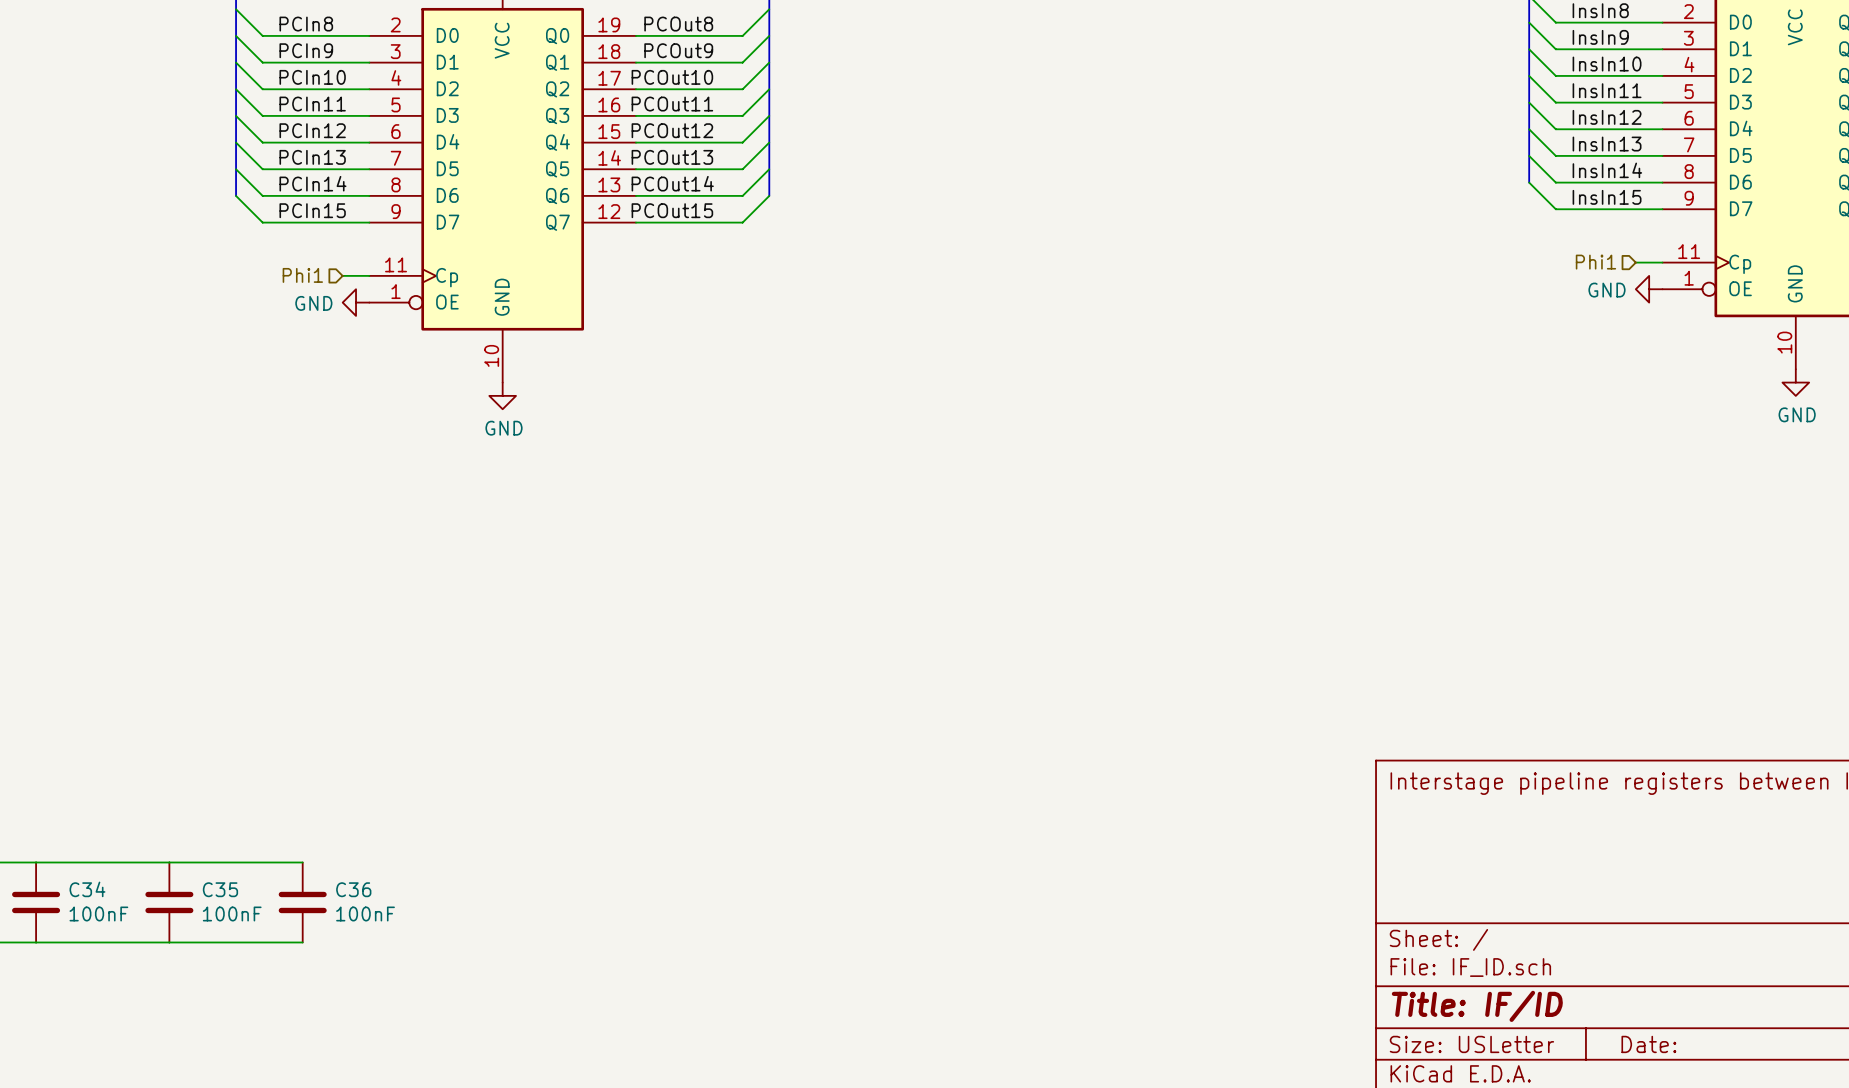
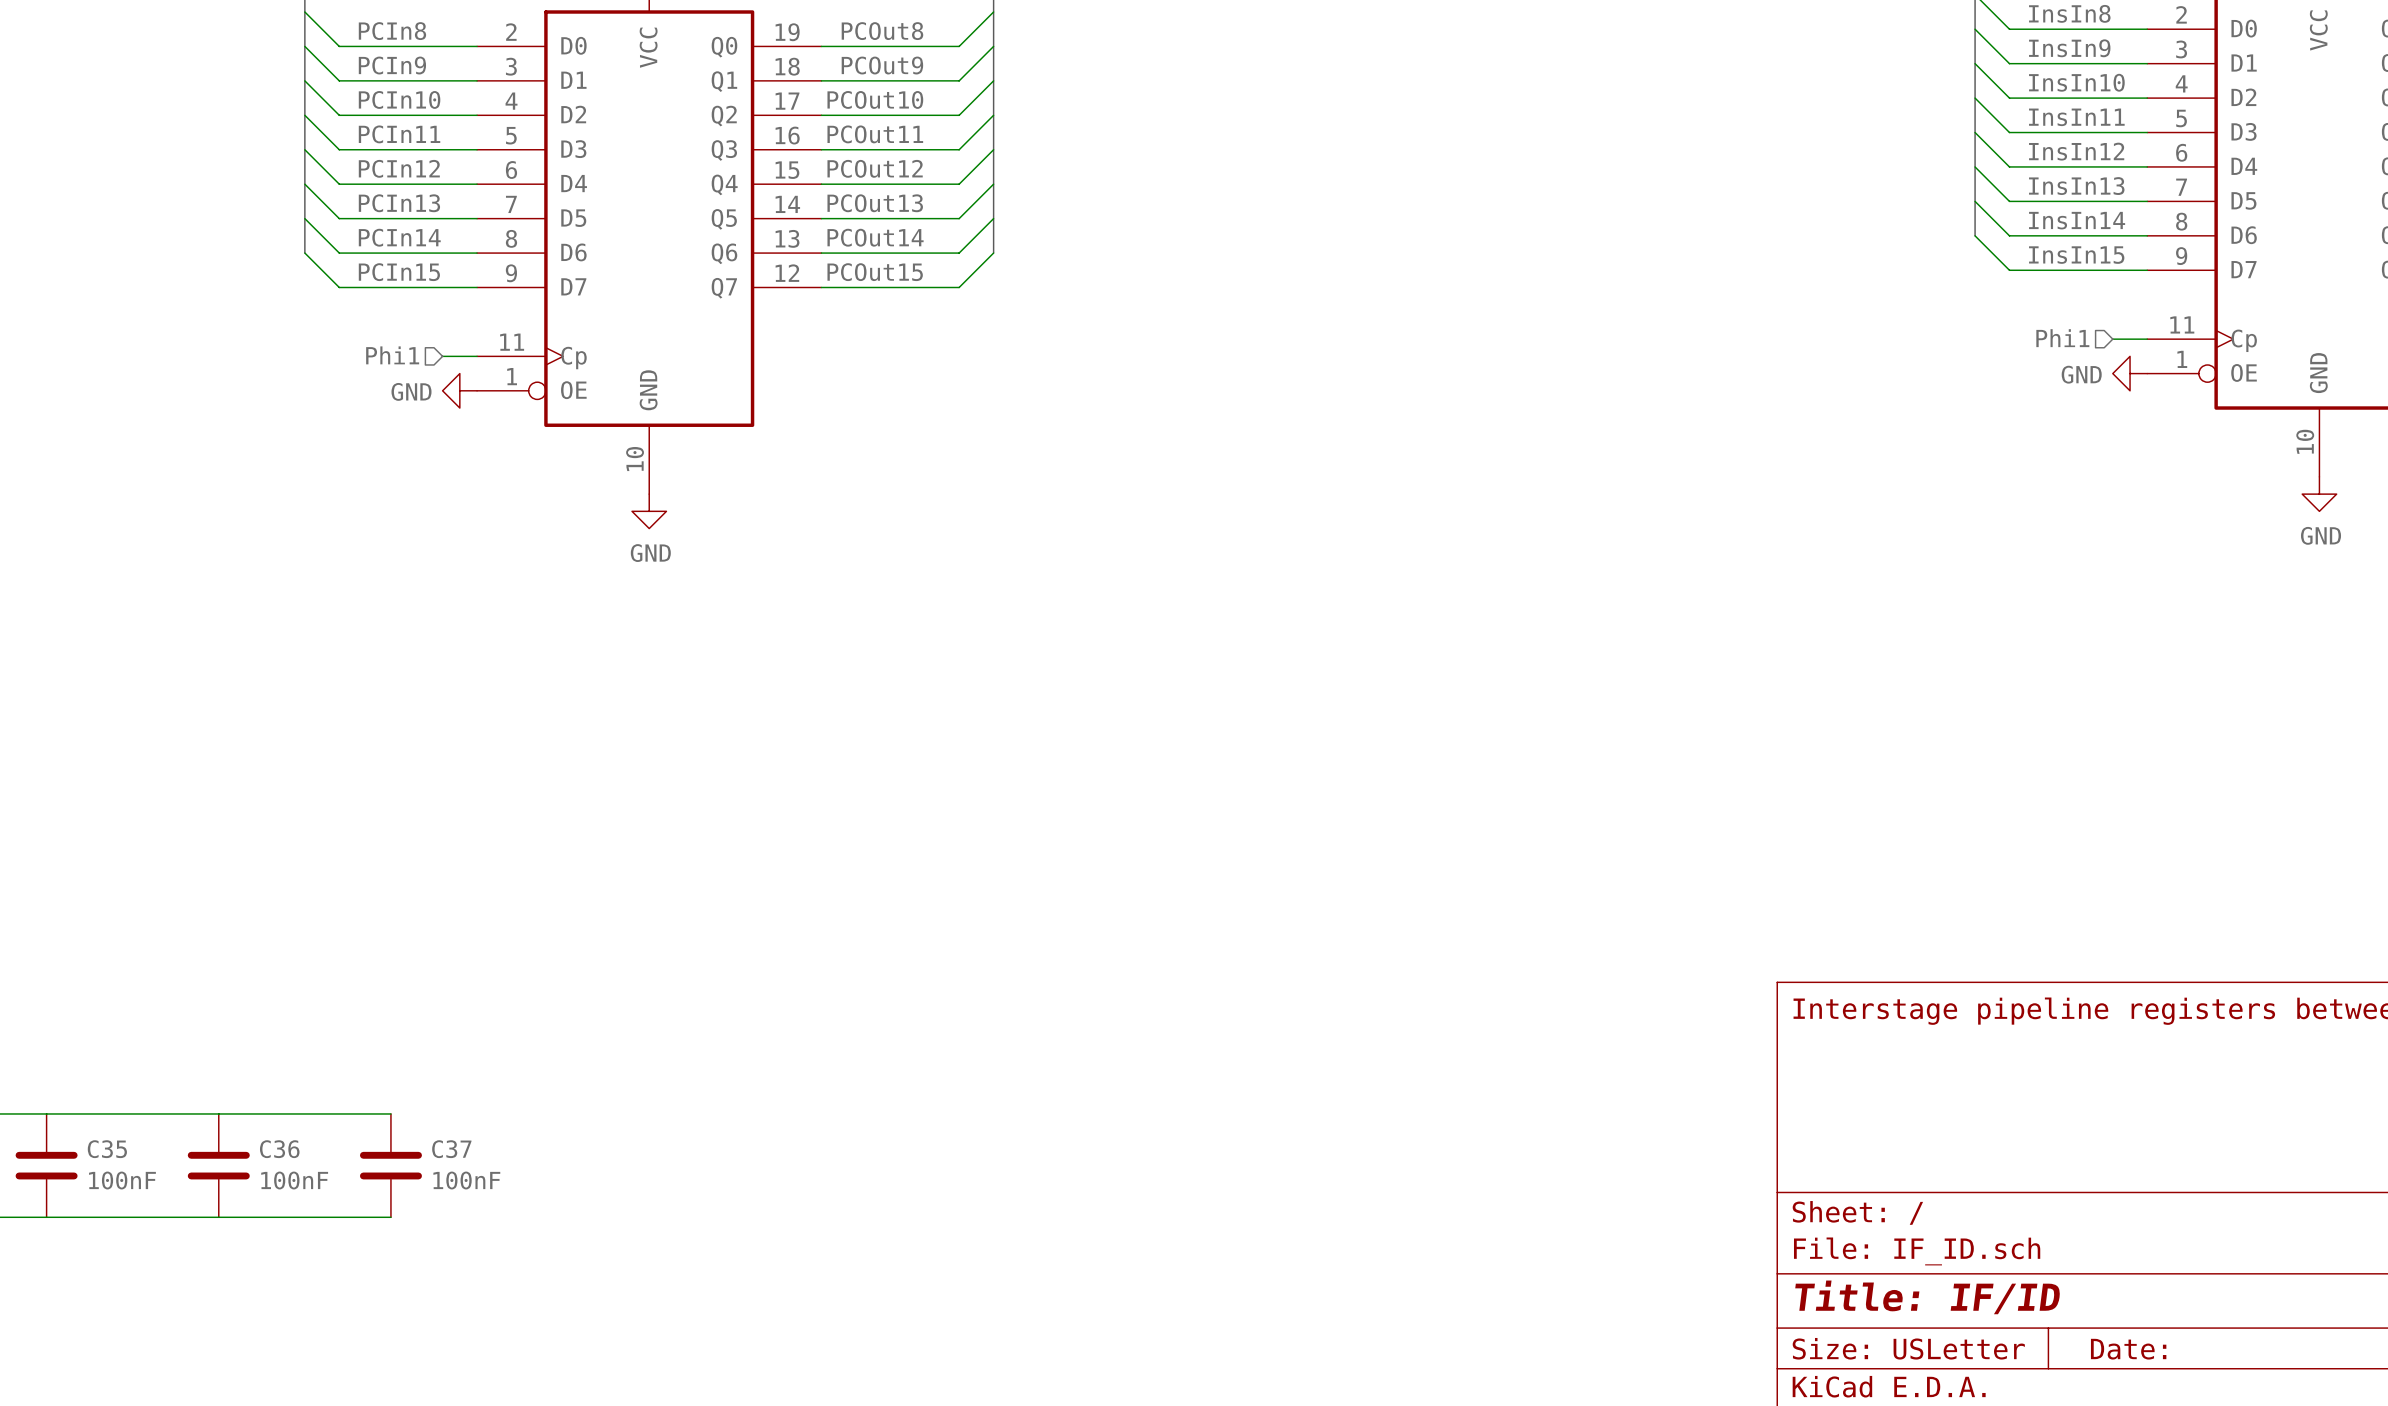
C34 name: C34 (87, 889) -> C35 (107, 1149)
C35 name: C35 (220, 889) -> C36 (279, 1149)
C36 name: C36 (353, 889) -> C37 (451, 1149)

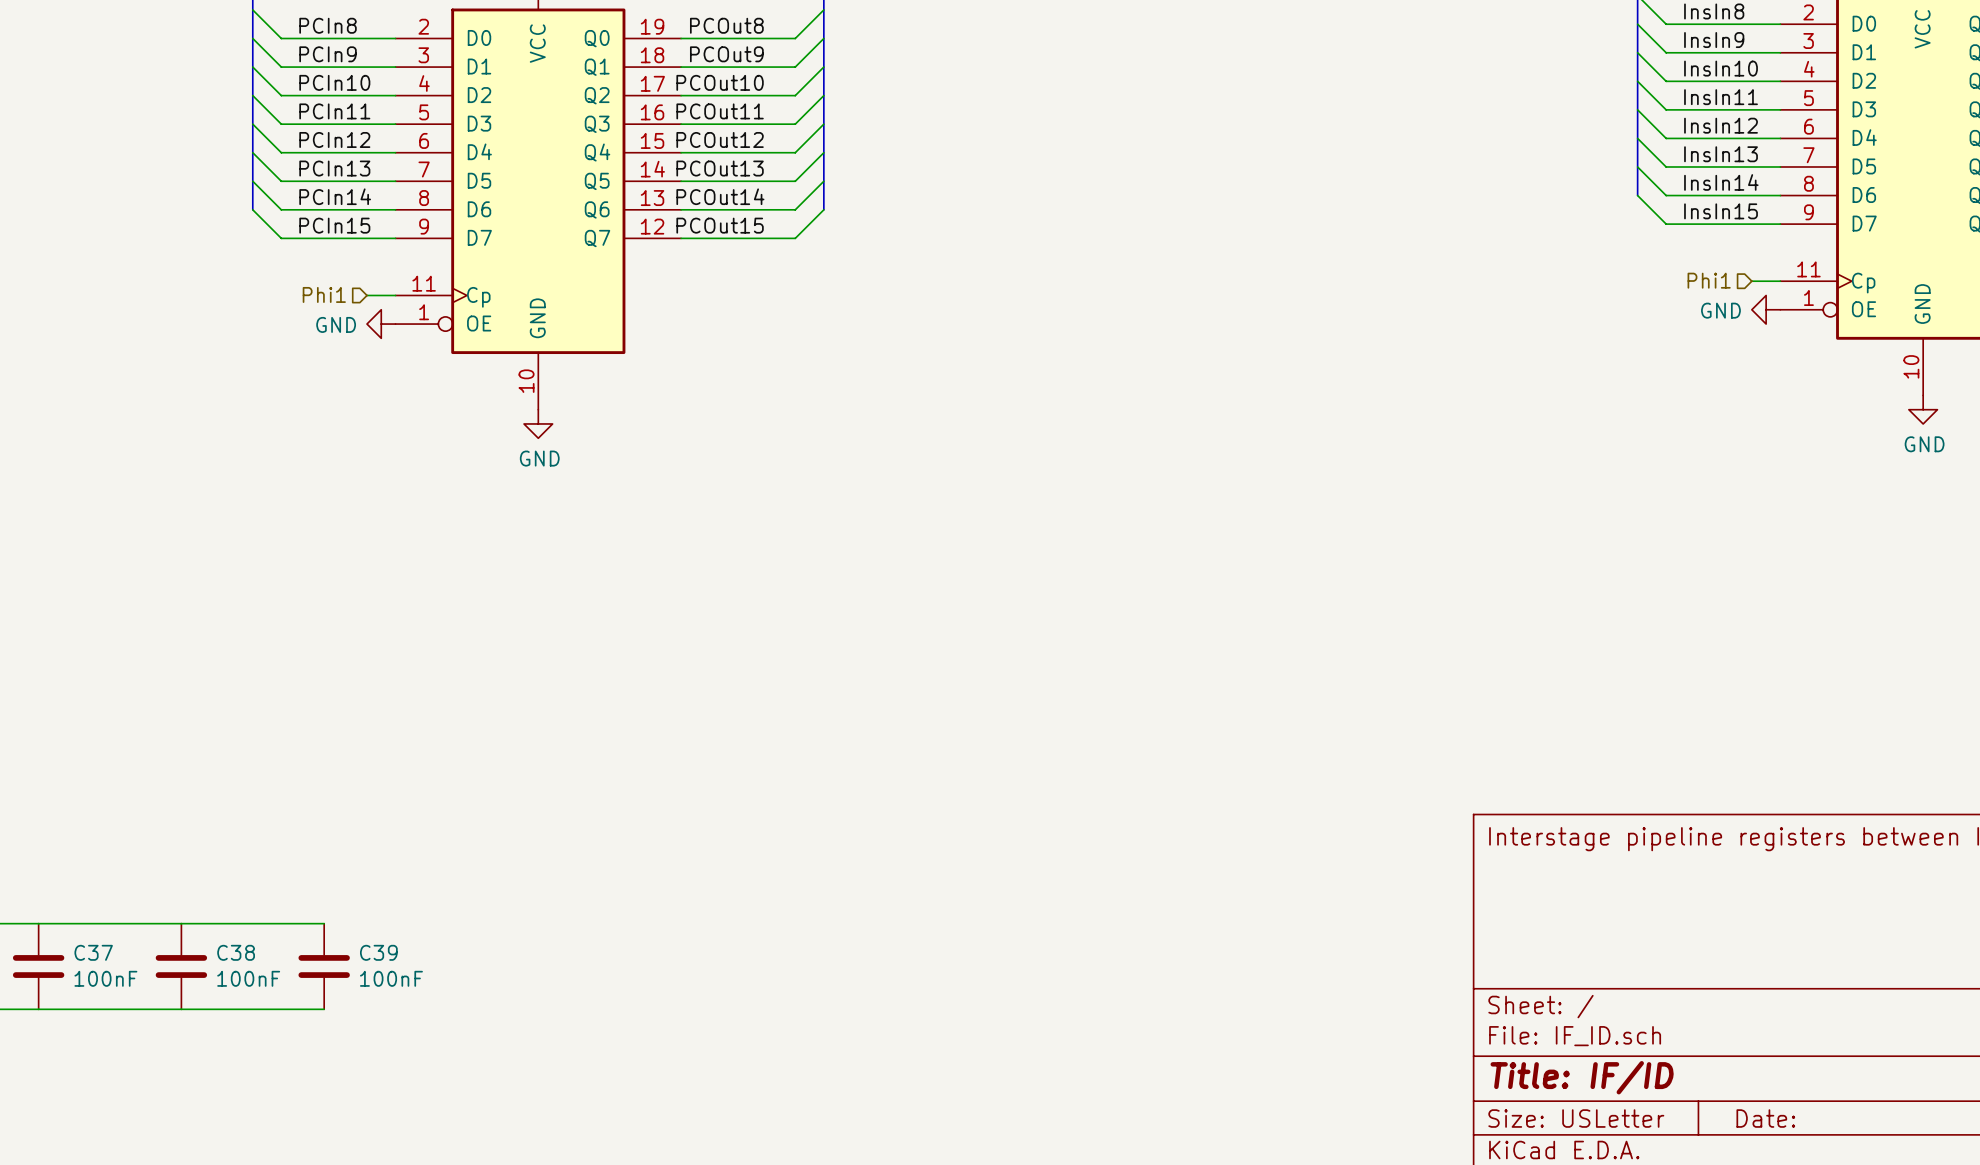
C35 name: C35 (107, 1149) -> C37 (93, 952)
C36 name: C36 (279, 1149) -> C38 (236, 952)
C37 name: C37 (451, 1149) -> C39 (378, 952)

